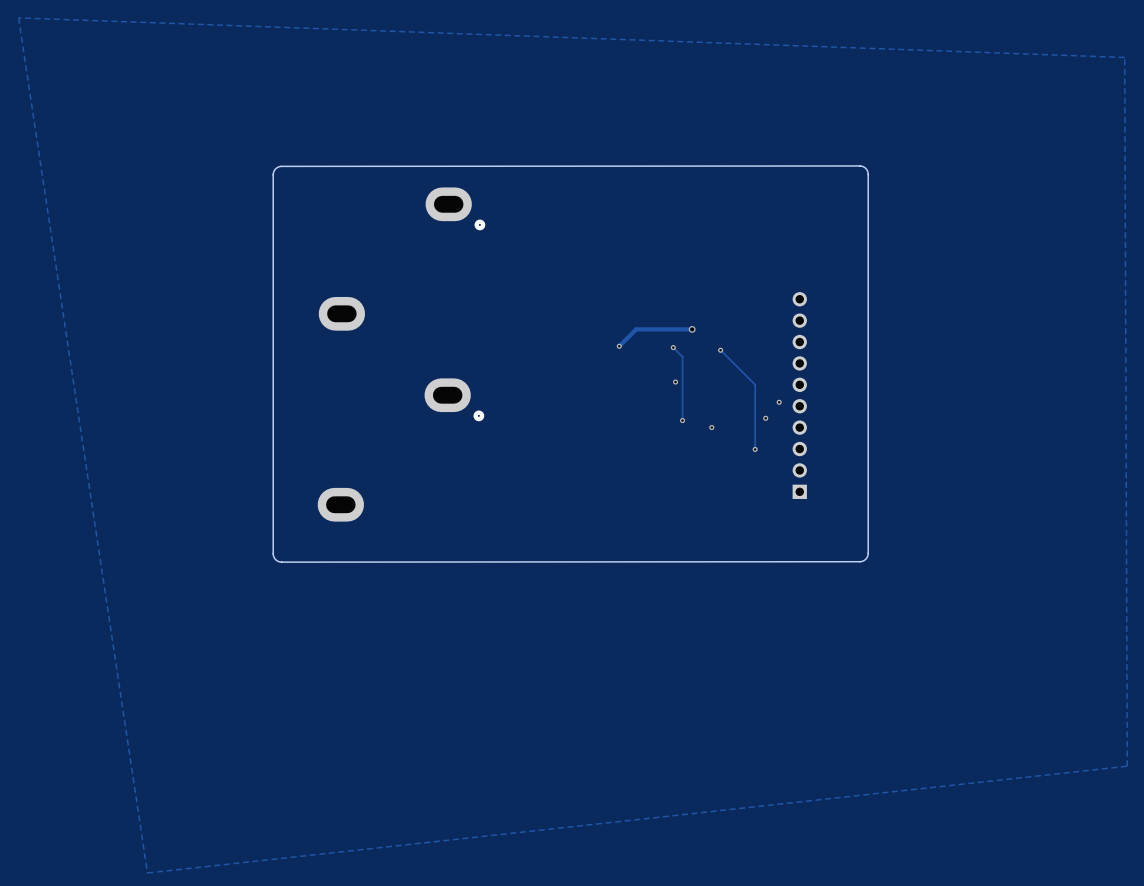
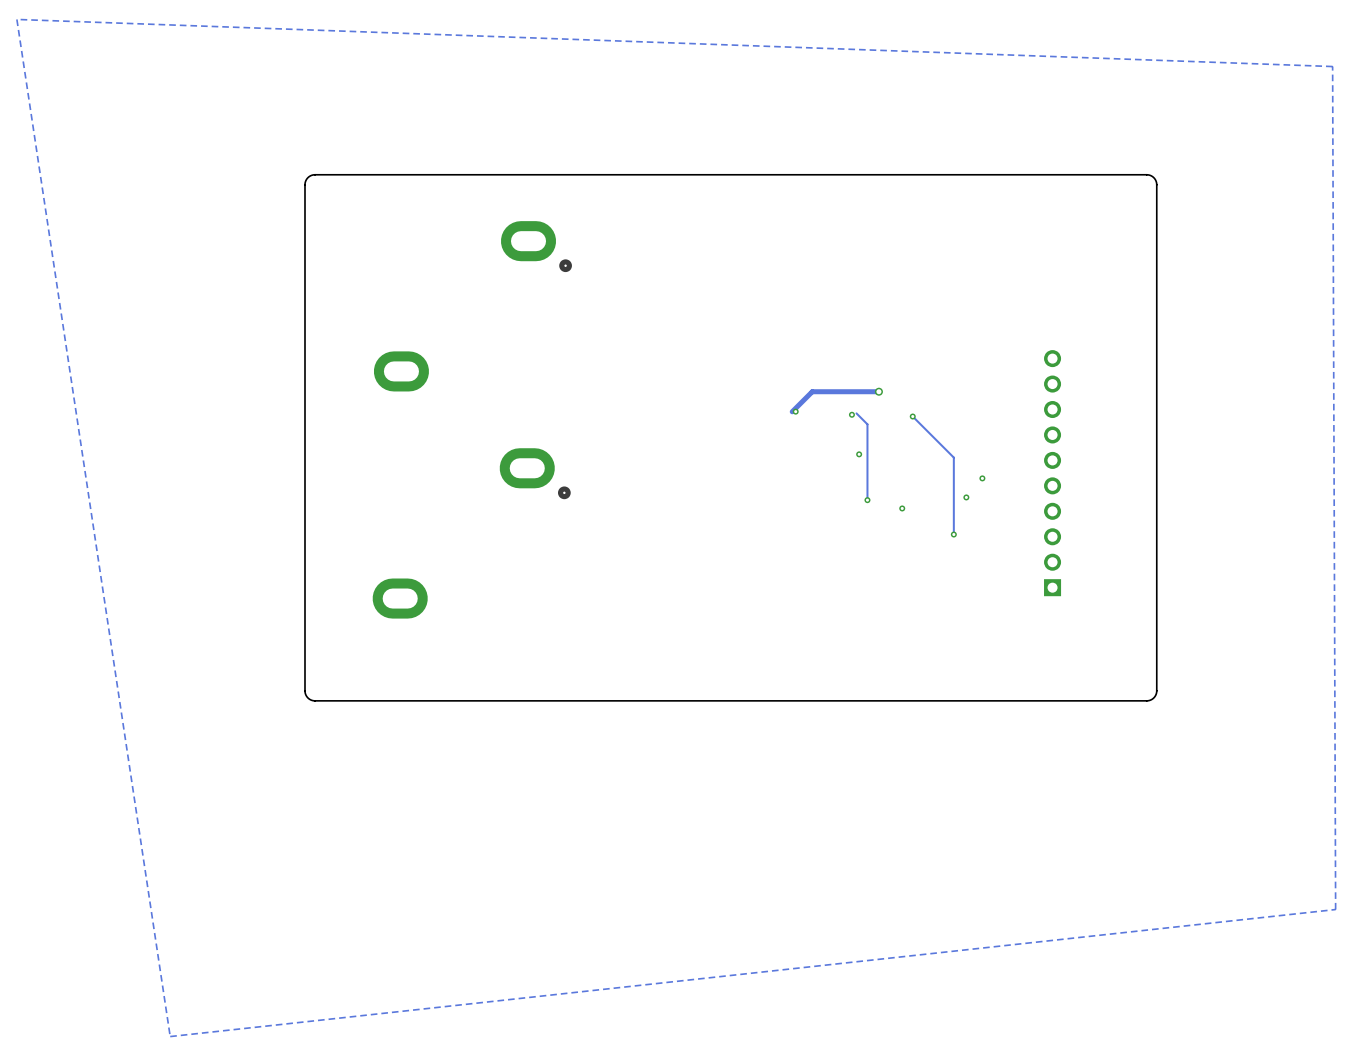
board edge: (859, 165) (281, 166) (276, 168) (273, 174) (274, 558) (281, 562) (859, 561) (864, 559) (868, 553) (868, 174) (865, 168) (859, 165) -> (1146, 174) (1153, 177) (1156, 184) (1156, 690) (1152, 699) (1146, 700) (315, 700) (306, 696) (304, 690) (304, 184) (309, 176) (315, 174) (1146, 174)
track: (692, 329) (636, 329) (619, 346) -> (878, 391) (812, 391) (792, 411)
via: (692, 329) -> none
via: none -> (878, 391)
via: (619, 346) -> none
track: (673, 347) (682, 356) (682, 420) -> (856, 413) (867, 424) (867, 500)
track: (720, 350) (755, 384) (755, 449) -> (912, 416) (953, 457) (953, 534)
via: none -> (912, 416)
via: (675, 382) -> none
via: none -> (859, 454)
part position: (799, 395) -> (1052, 473)
via: (779, 402) -> none
via: none -> (982, 478)
via: (765, 418) -> none
via: none -> (966, 497)
via: (682, 420) -> none
via: none -> (867, 500)
via: (711, 427) -> none
via: none -> (902, 508)
via: (755, 449) -> none
via: none -> (953, 534)

